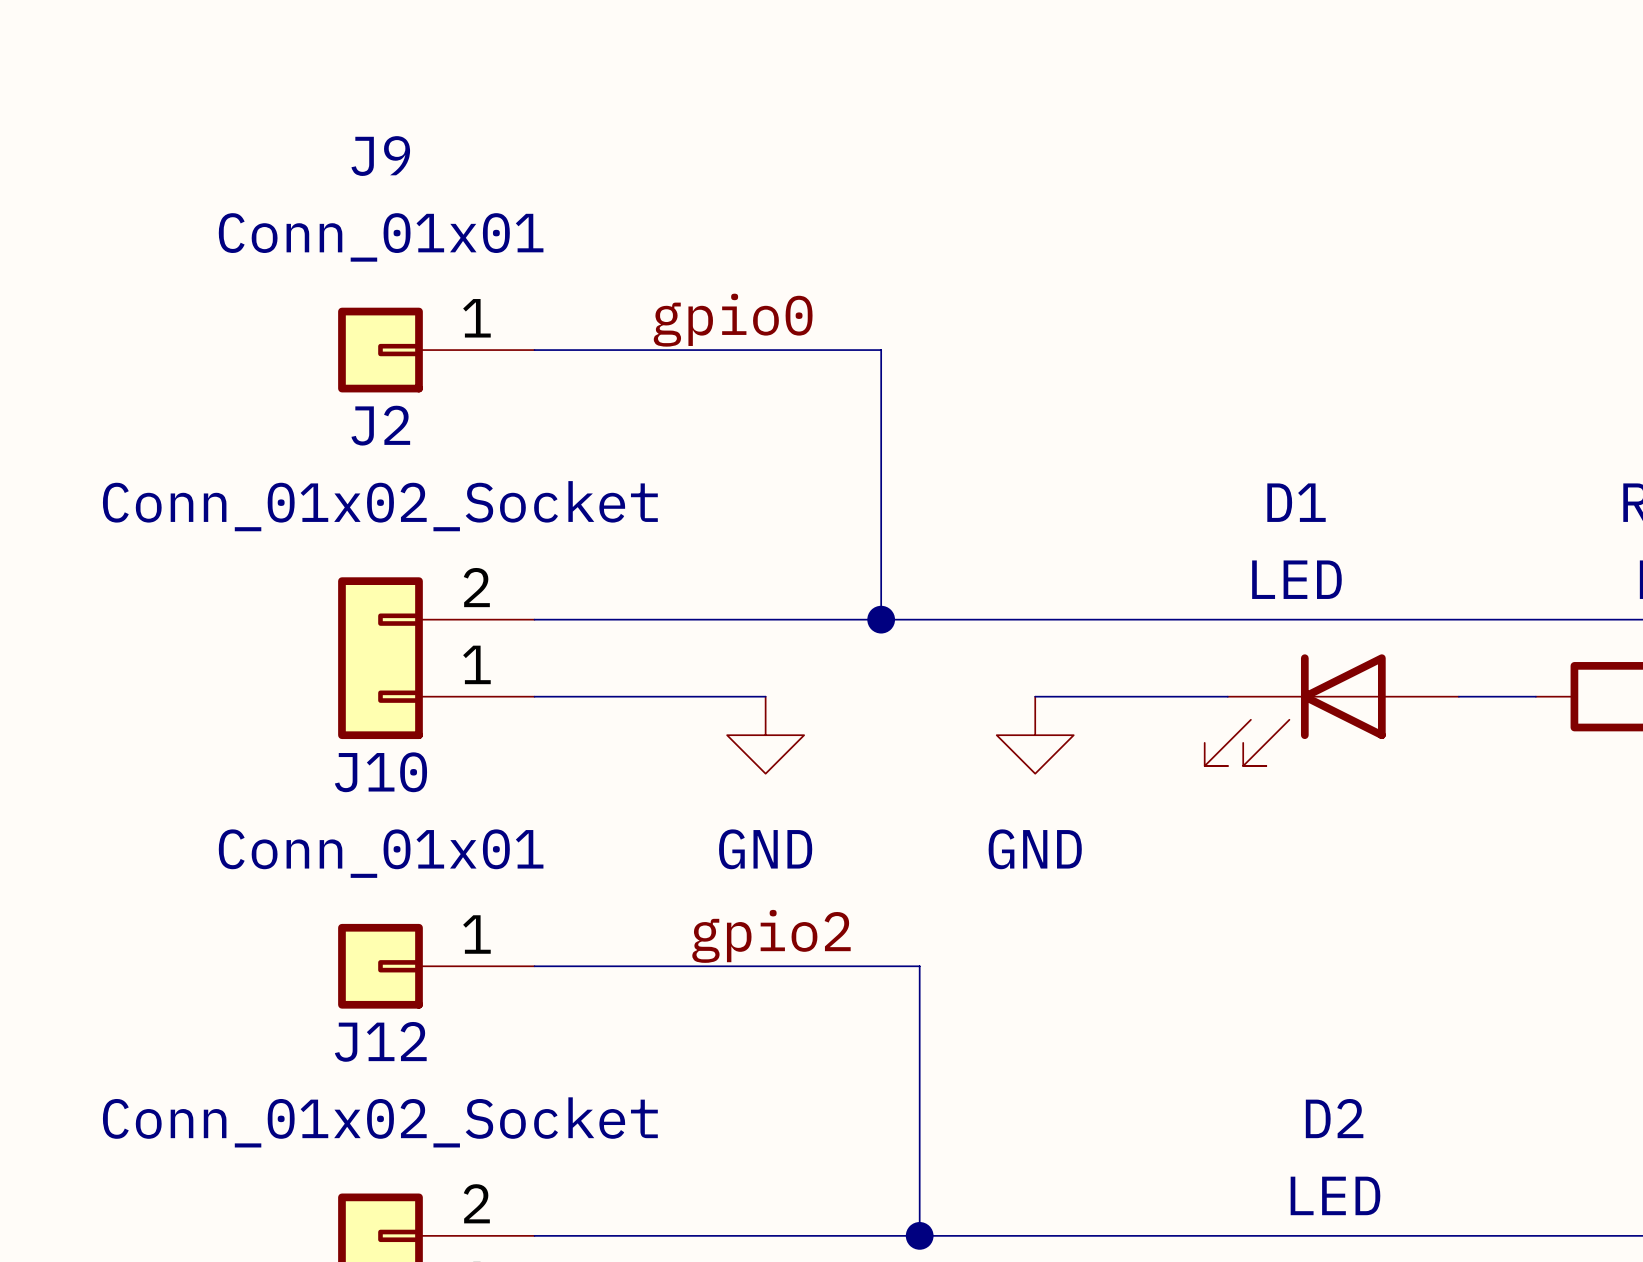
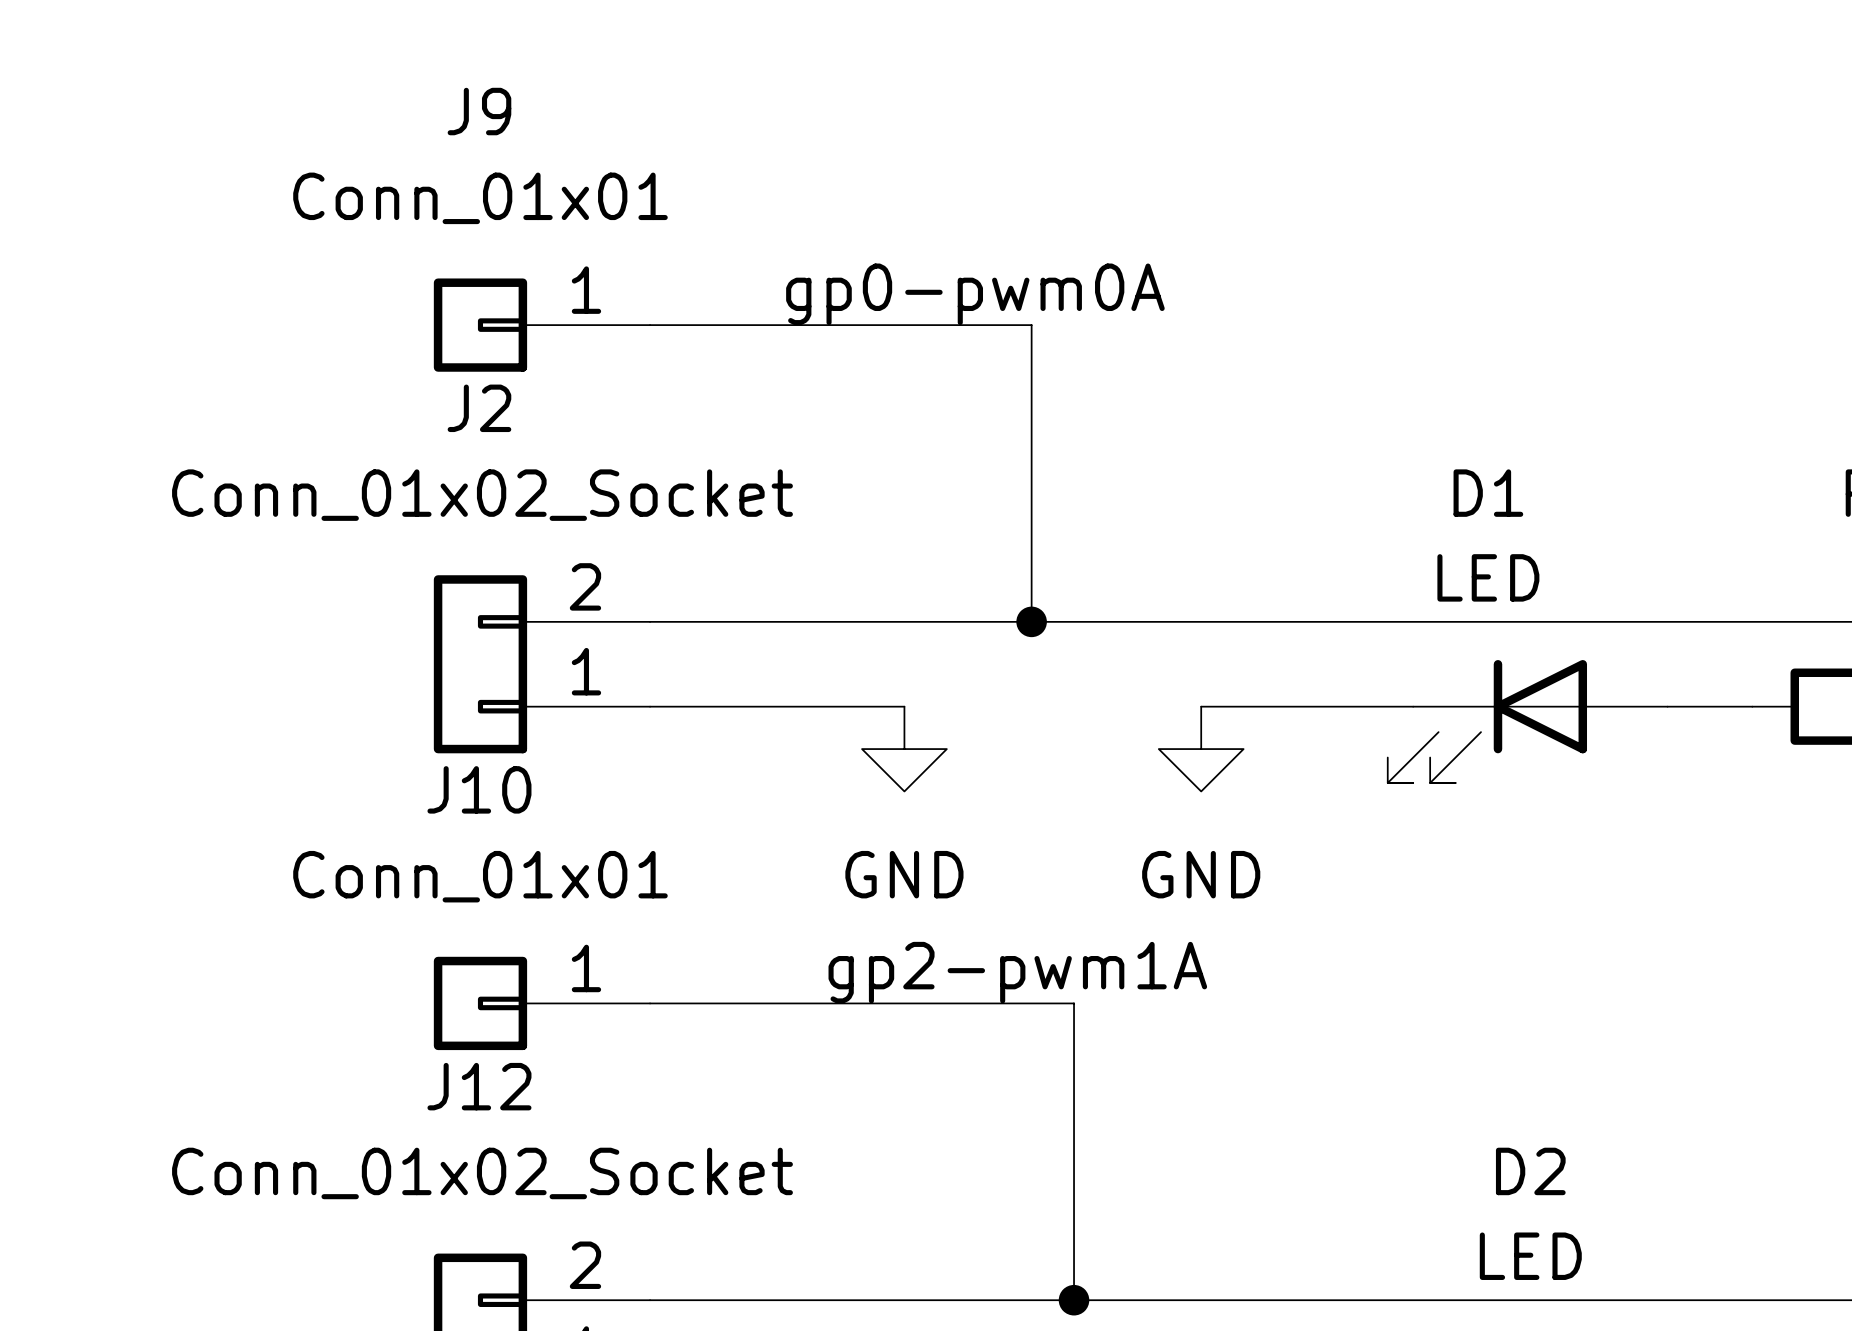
label: gpio0 (733, 320) -> gp0-pwm0A (975, 294)
label: gpio2 (771, 936) -> gp2-pwm1A (1017, 972)

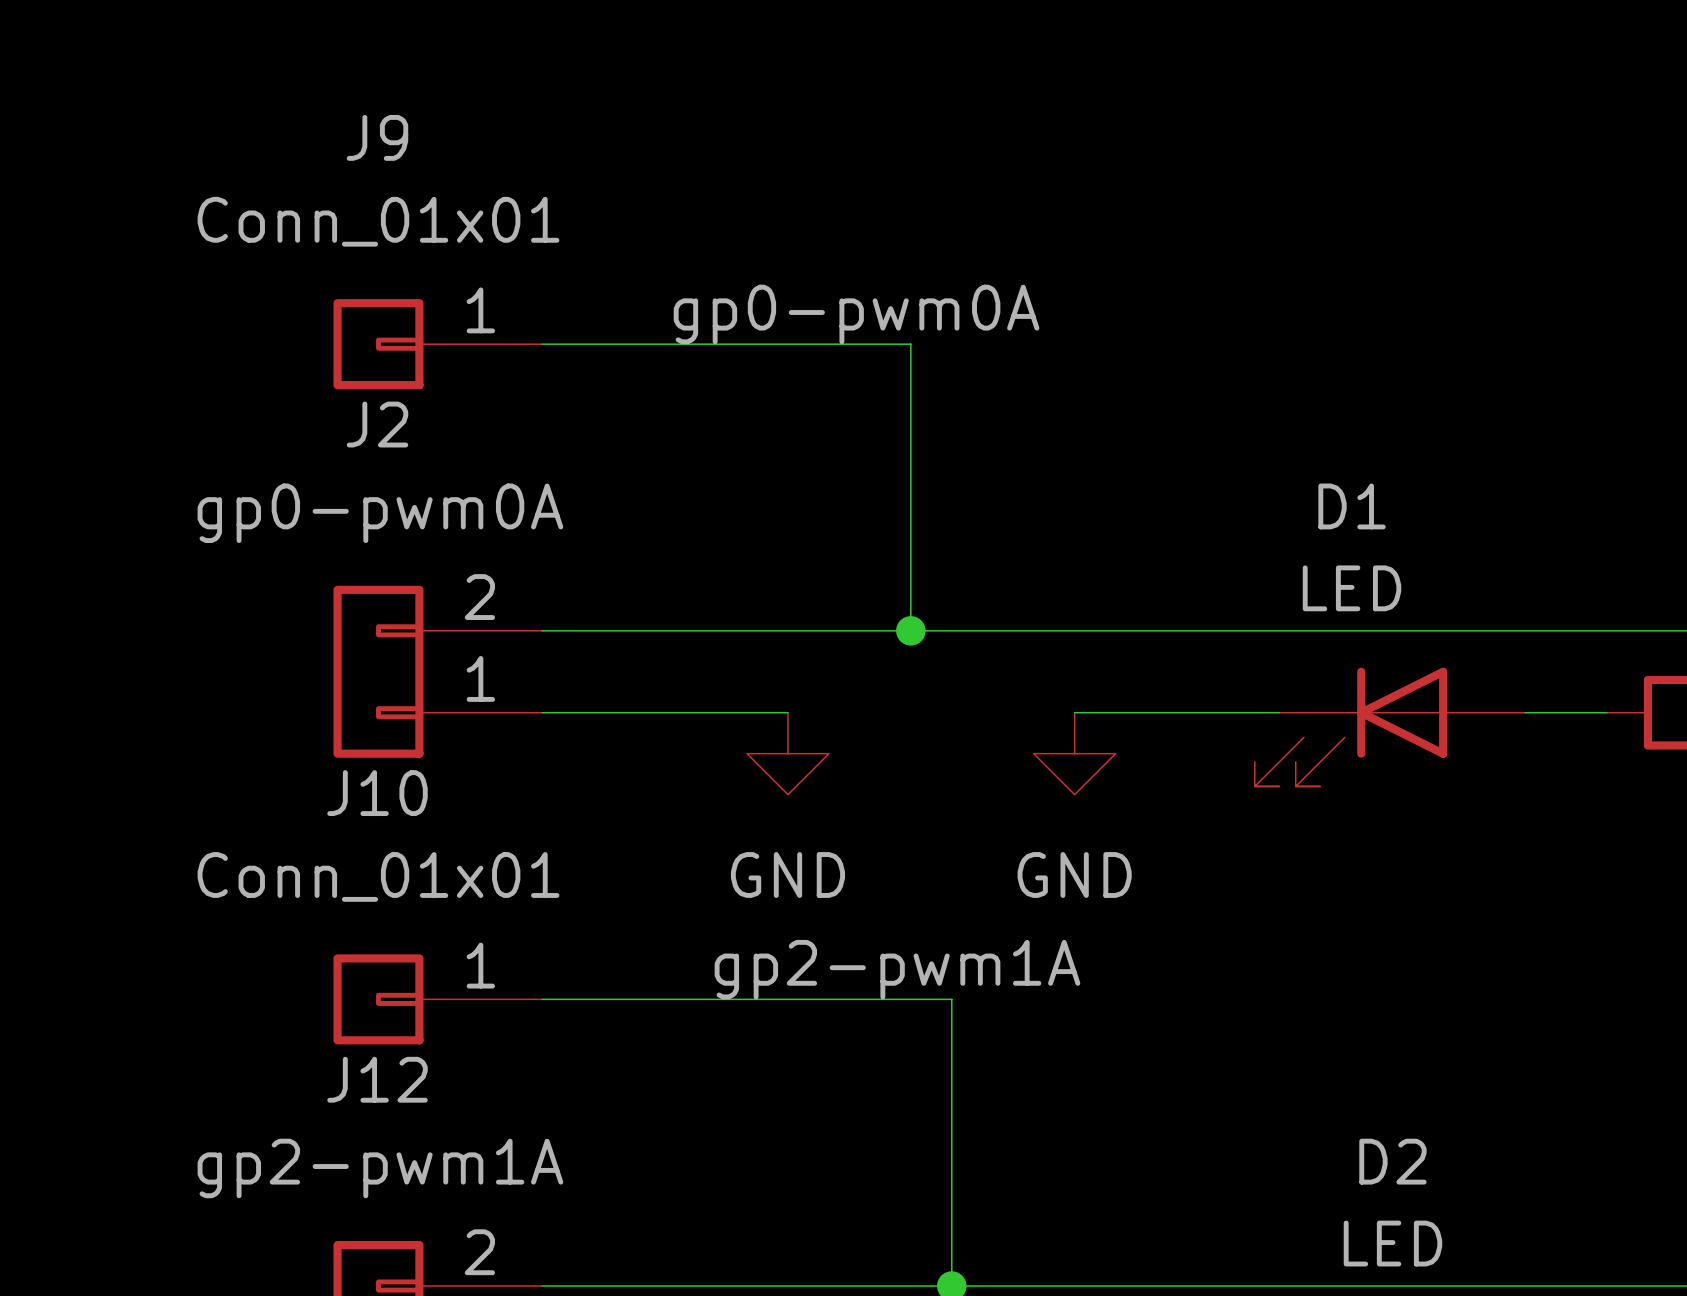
J2 value: Conn_01x02_Socket (482, 495) -> gp0-pwm0A (380, 513)
J12 value: Conn_01x02_Socket (482, 1173) -> gp2-pwm1A (380, 1168)

